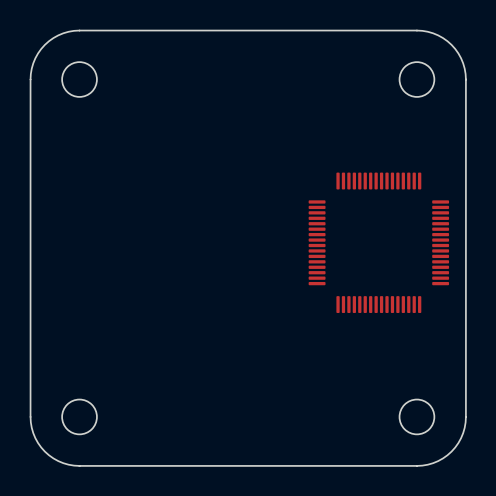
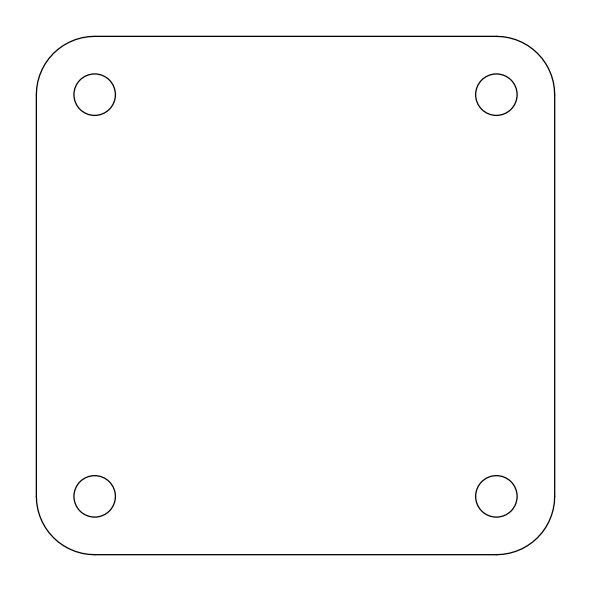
part: (378, 242) -> none

